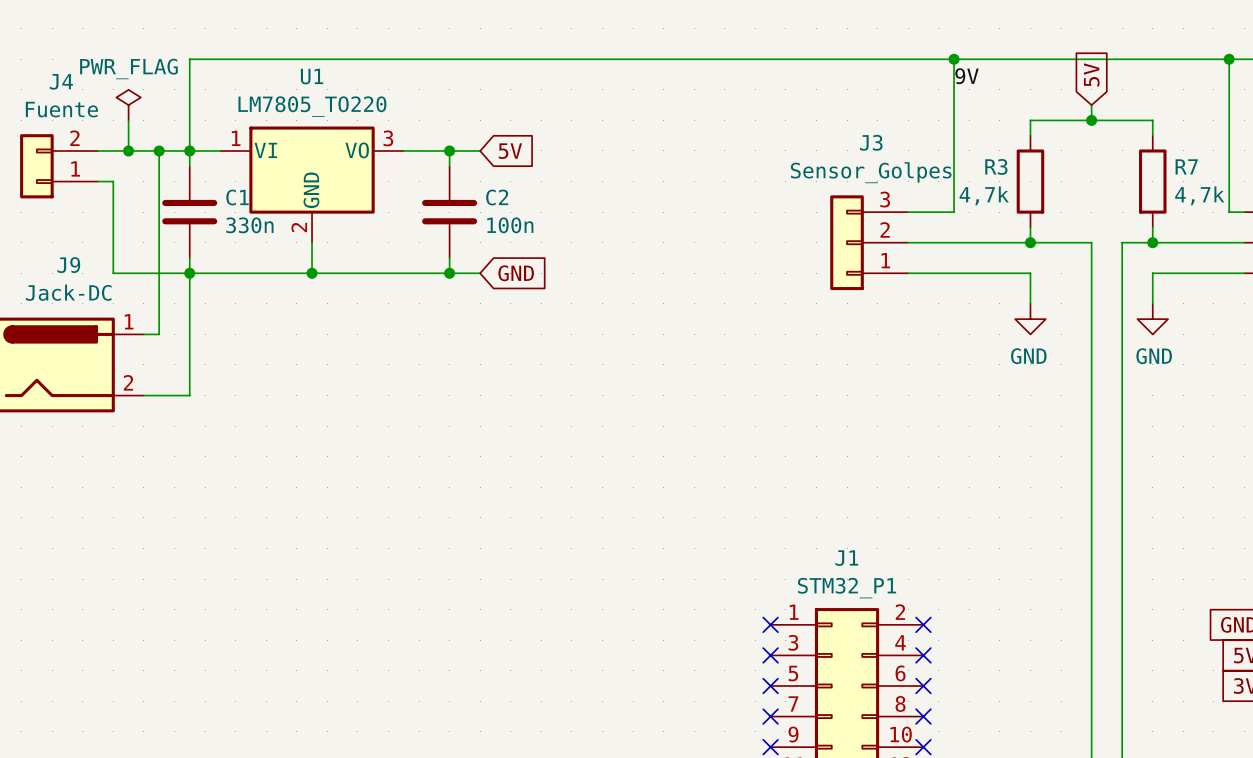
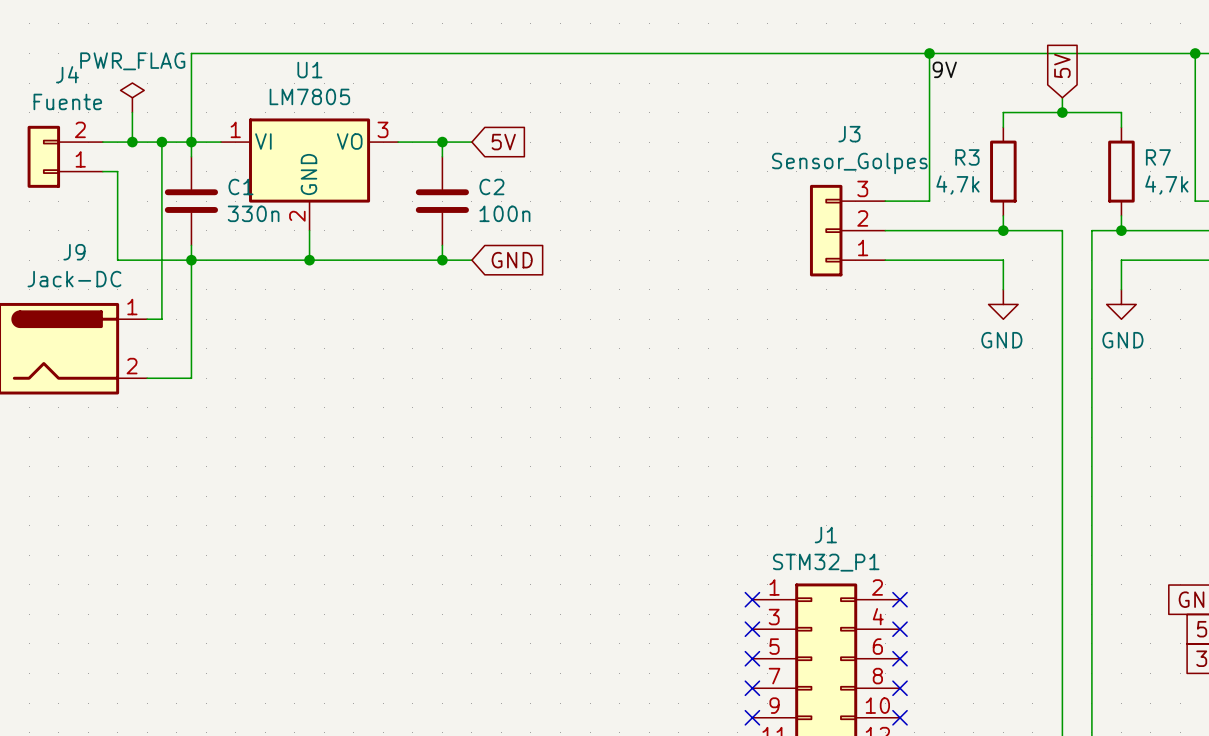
U1 value: LM7805_TO220 (312, 106) -> LM7805 (309, 96)

